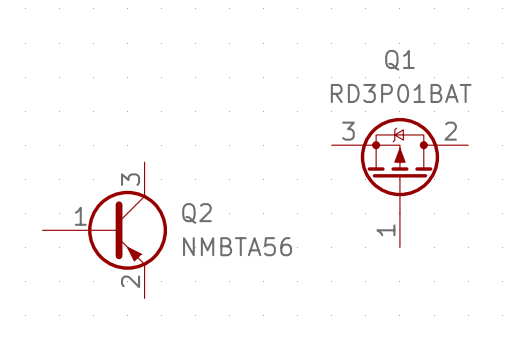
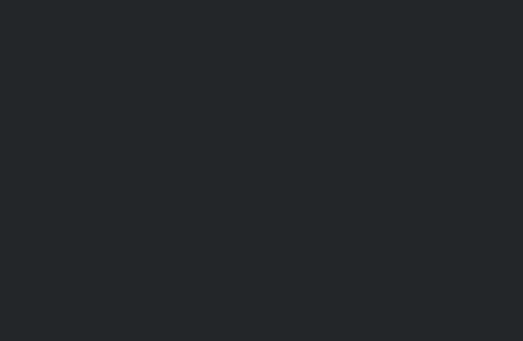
Q1: RD3P01BAT (399, 182) -> none
Q2: NMBTA56 (104, 230) -> none

